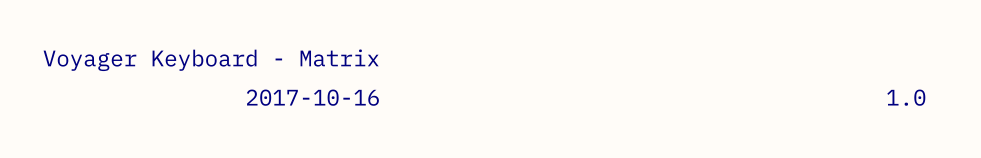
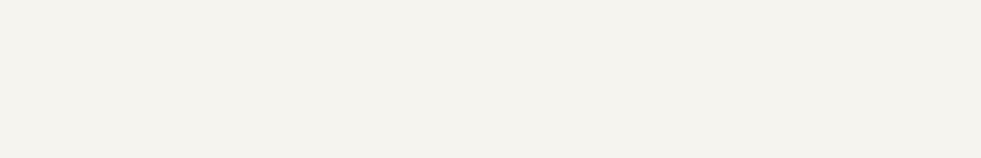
text: Voyager Keyboard - Matrix (211, 60) -> none
text: 2017-10-16 (312, 97) -> none
text: 1.0 (906, 97) -> none

